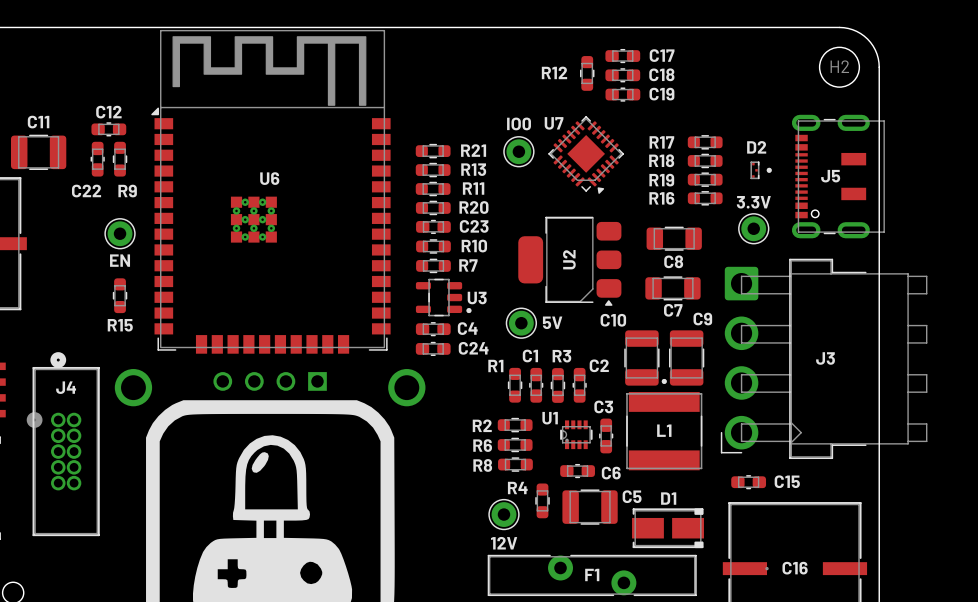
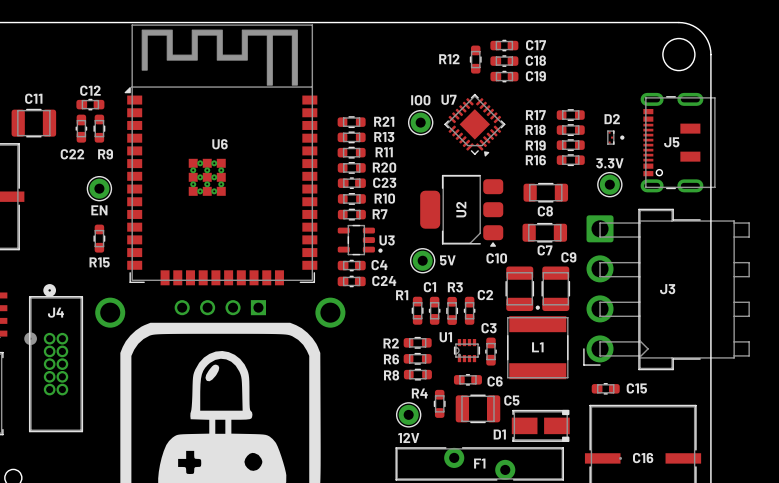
H2 name: H2 (839, 66) -> none
D1 name position: D1 (668, 498) -> D1 (499, 434)

